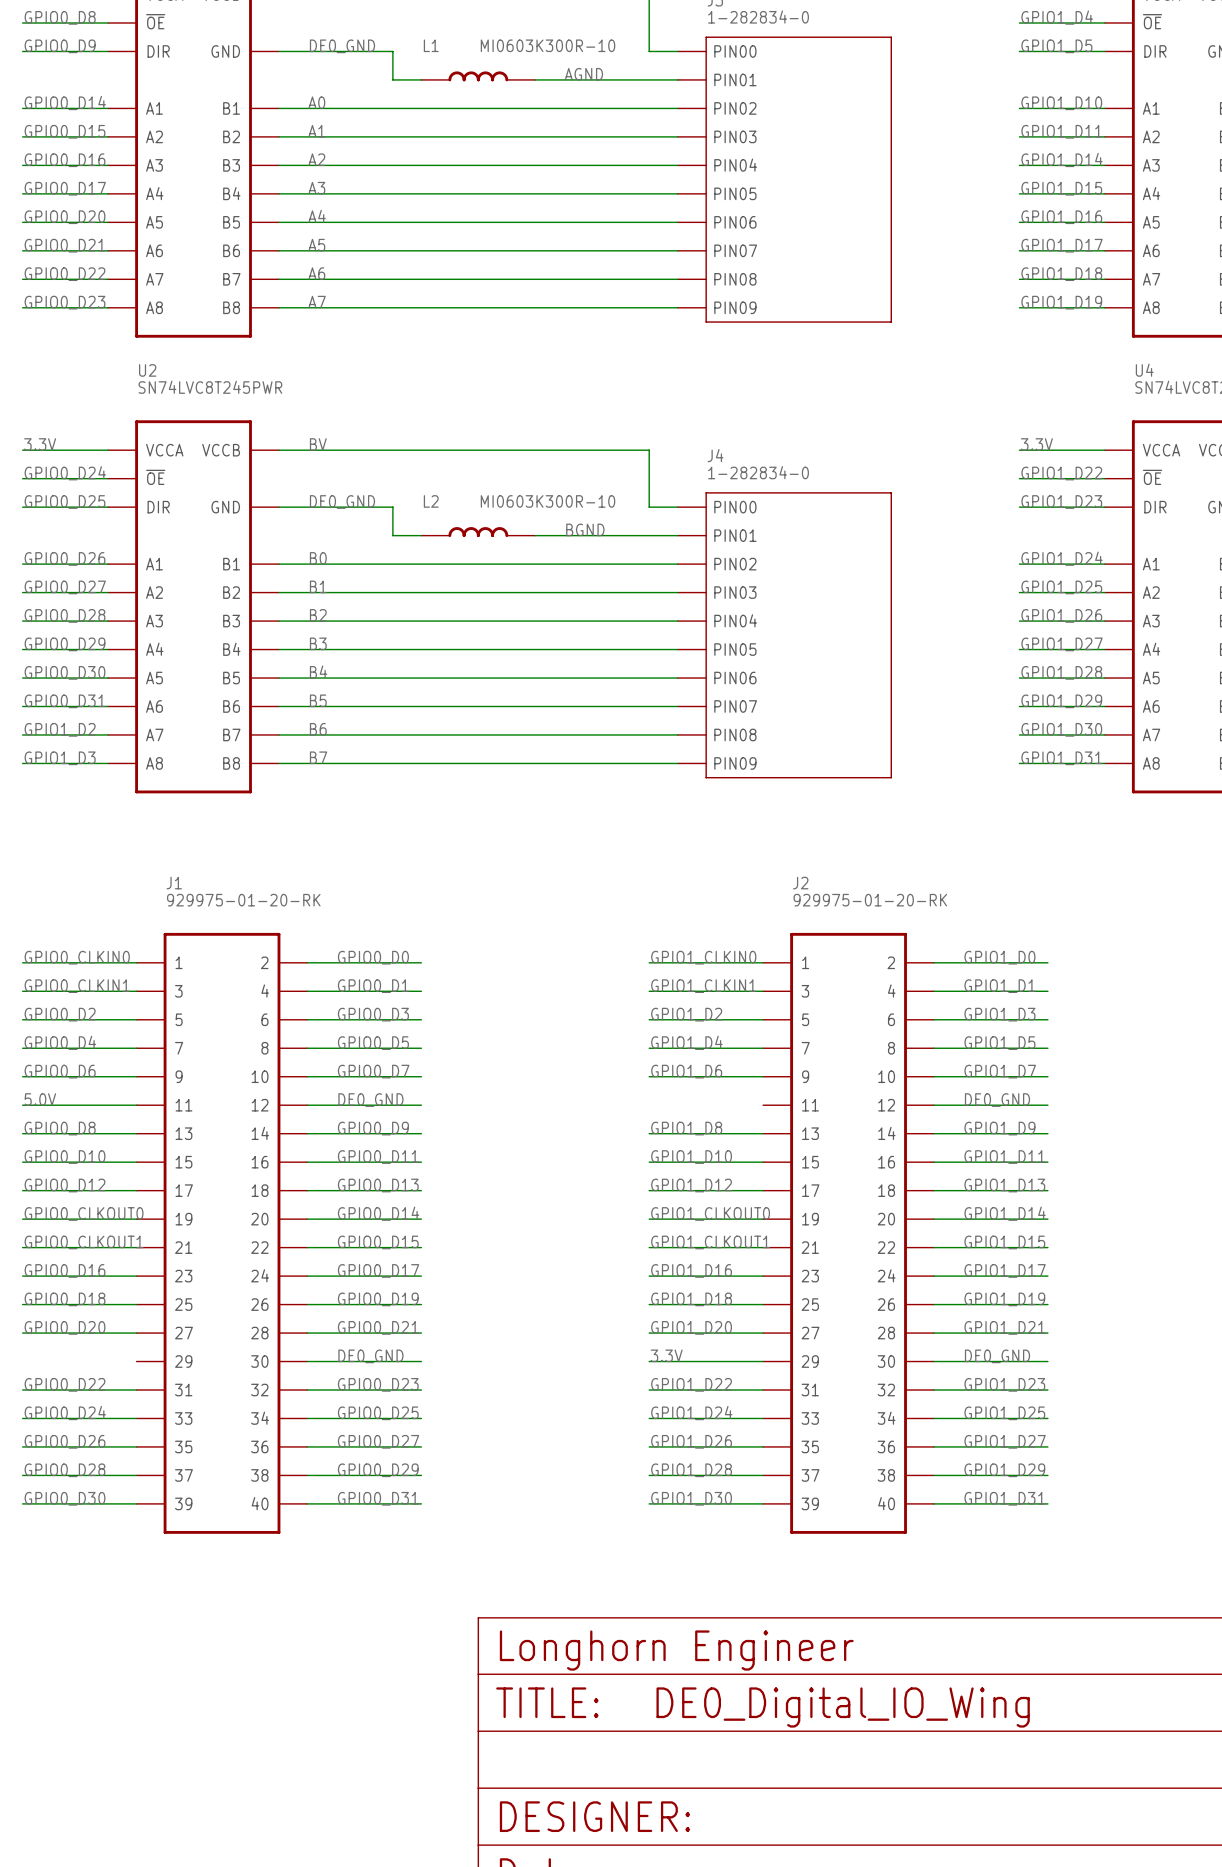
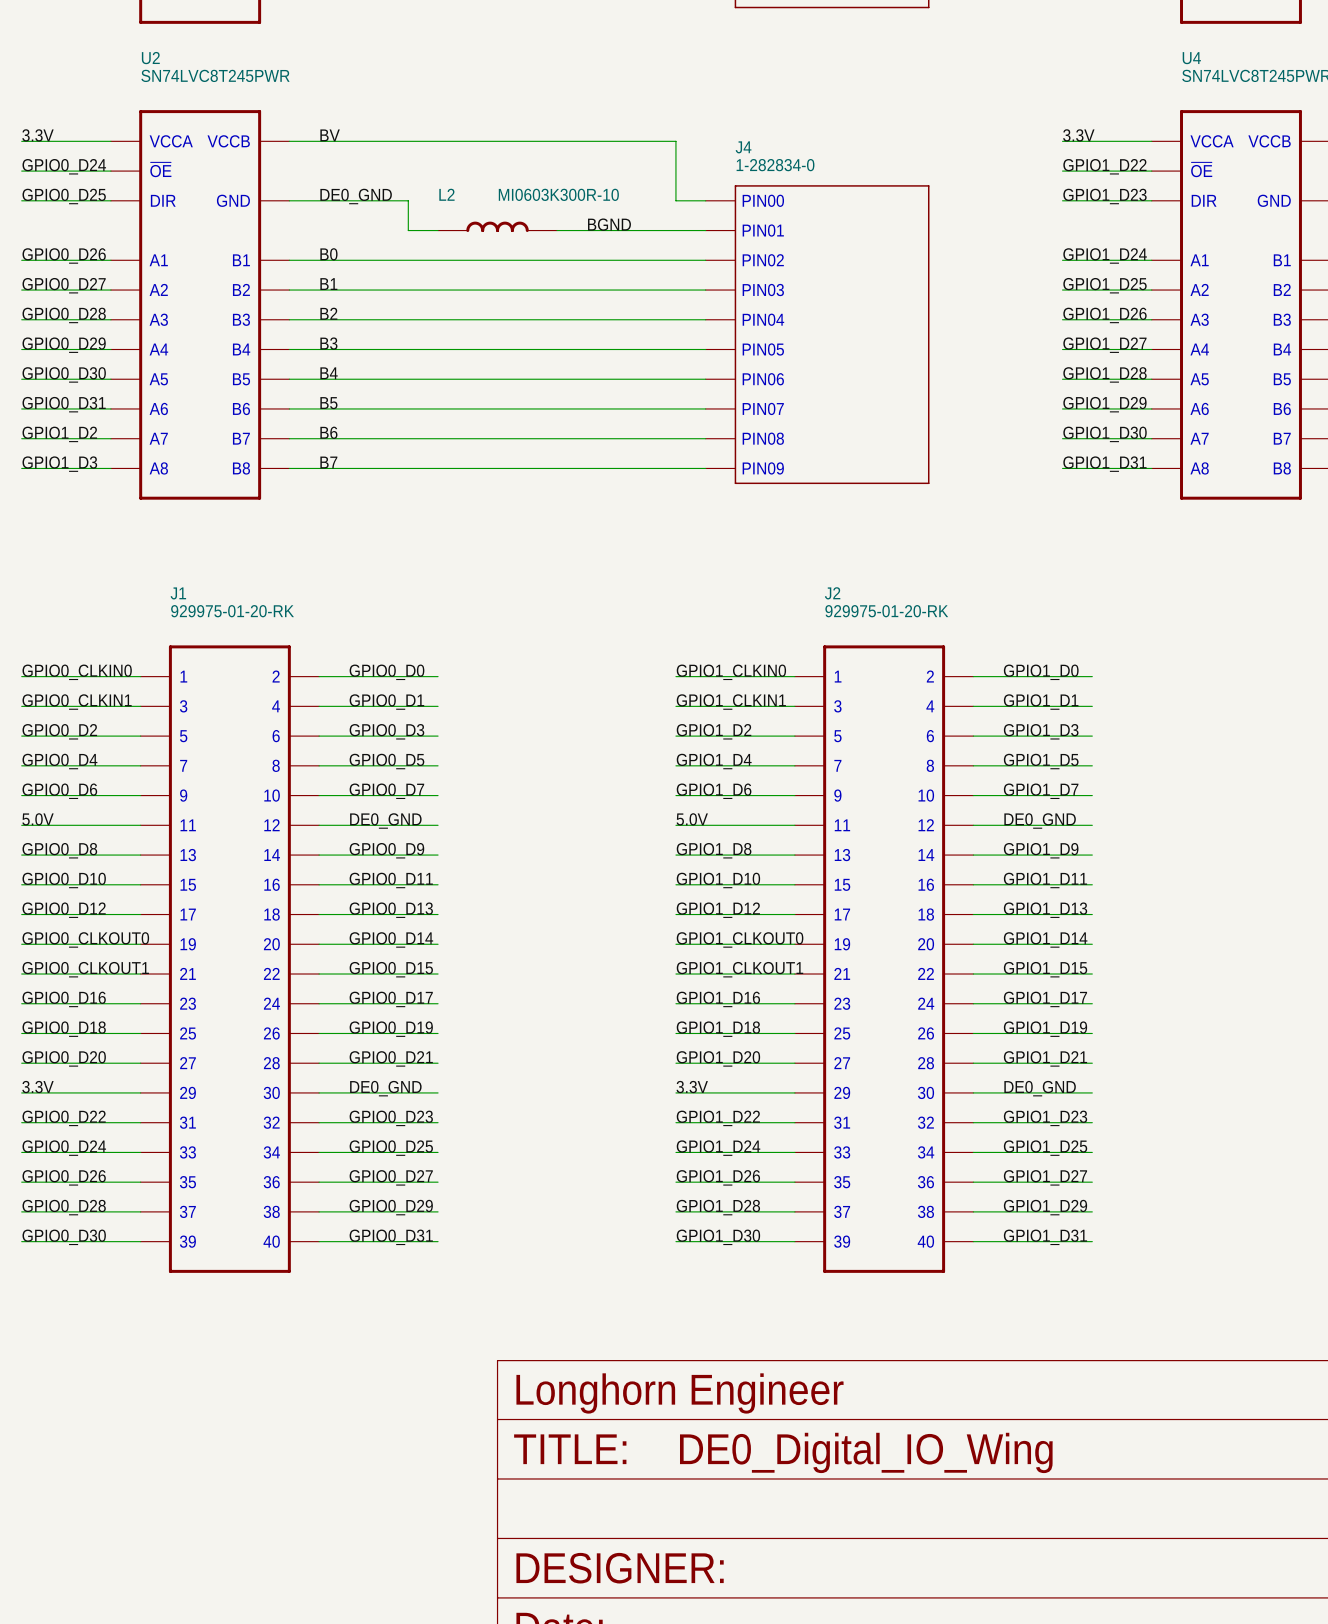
label: none -> 5.0V (692, 819)
wire: none -> (675, 825) (794, 825)
label: none -> 3.3V (37, 1087)
wire: none -> (21, 1092) (140, 1092)

